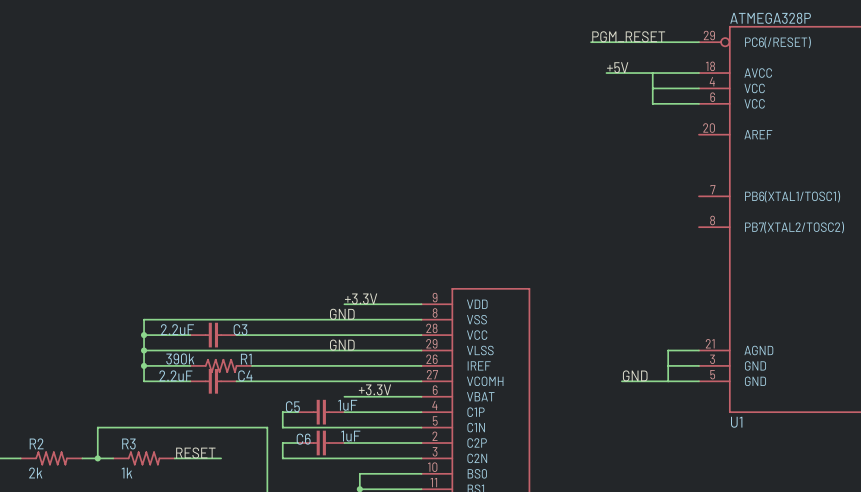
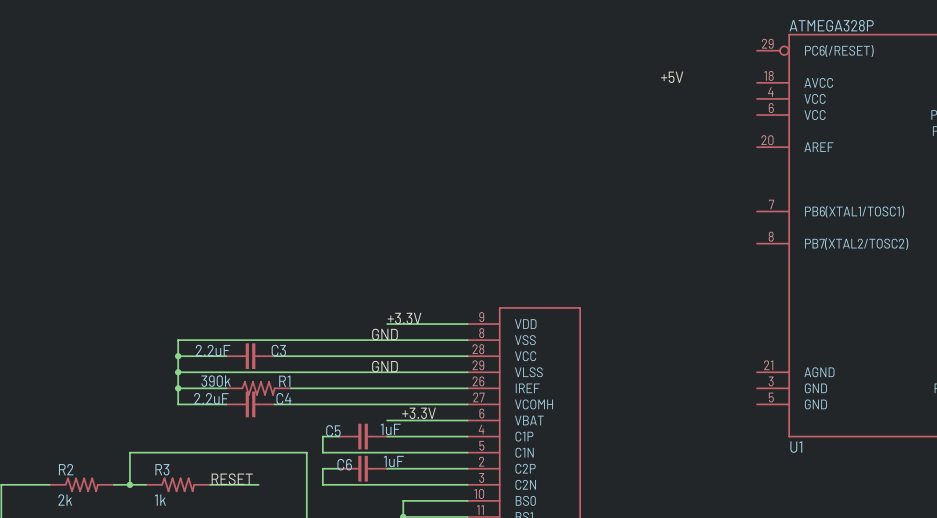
label: PGM_RESET (628, 36) -> none
wire: (591, 42) (698, 42) -> none
wire: (606, 73) (698, 73) -> none
wire: (652, 73) (652, 103) (698, 103) -> none
wire: (652, 88) (698, 88) -> none
wire: (698, 350) (668, 350) (668, 381) -> none
wire: (668, 365) (698, 365) -> none
label: GND (635, 375) -> none
wire: (621, 381) (698, 381) -> none

